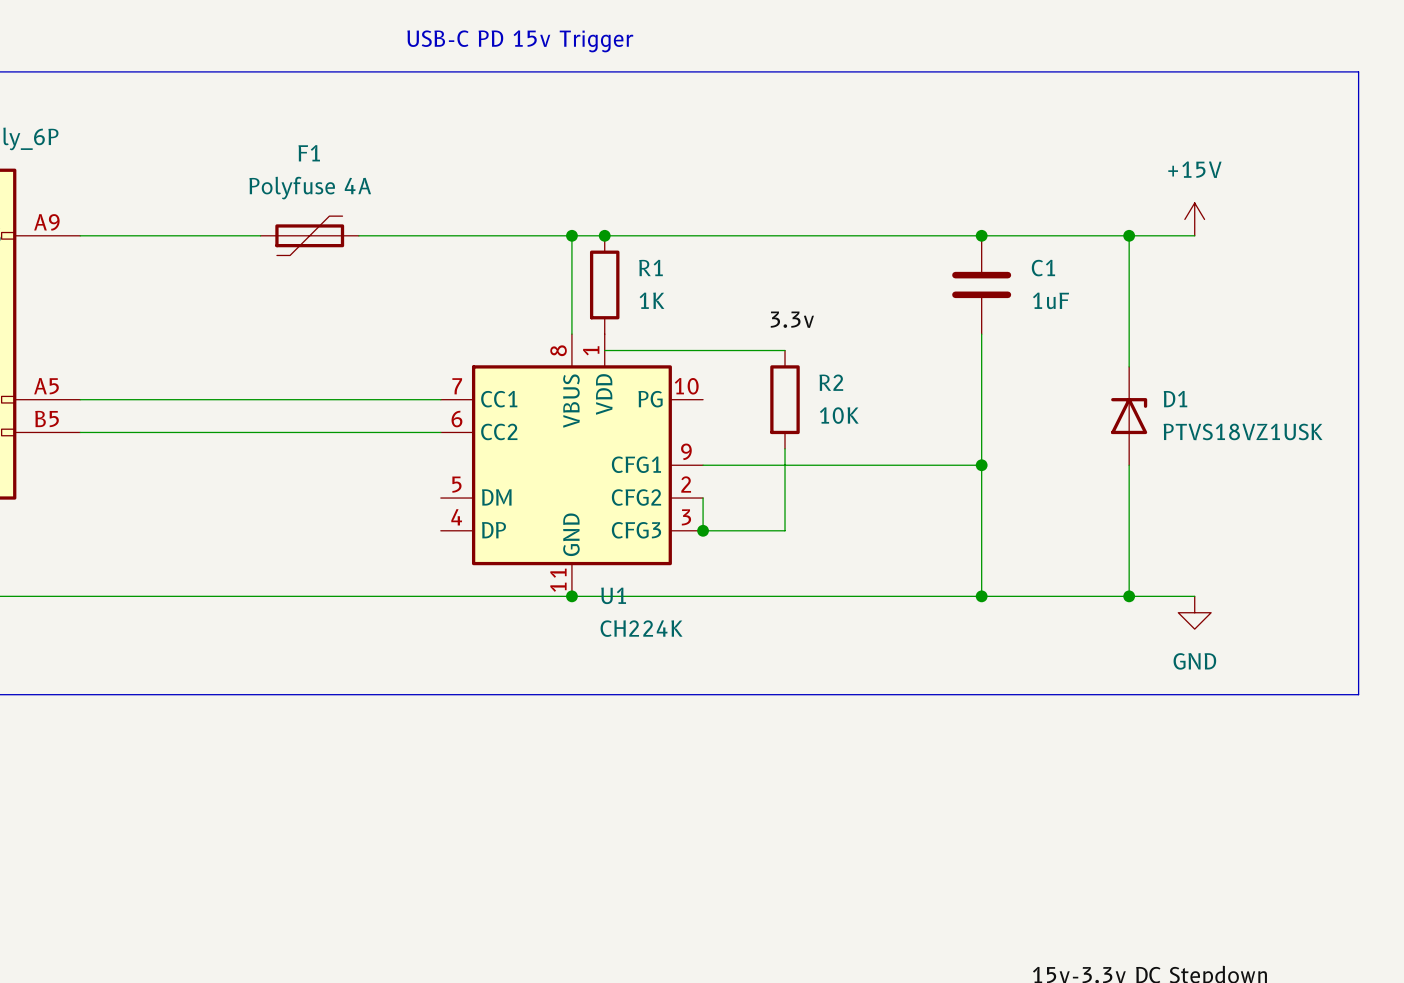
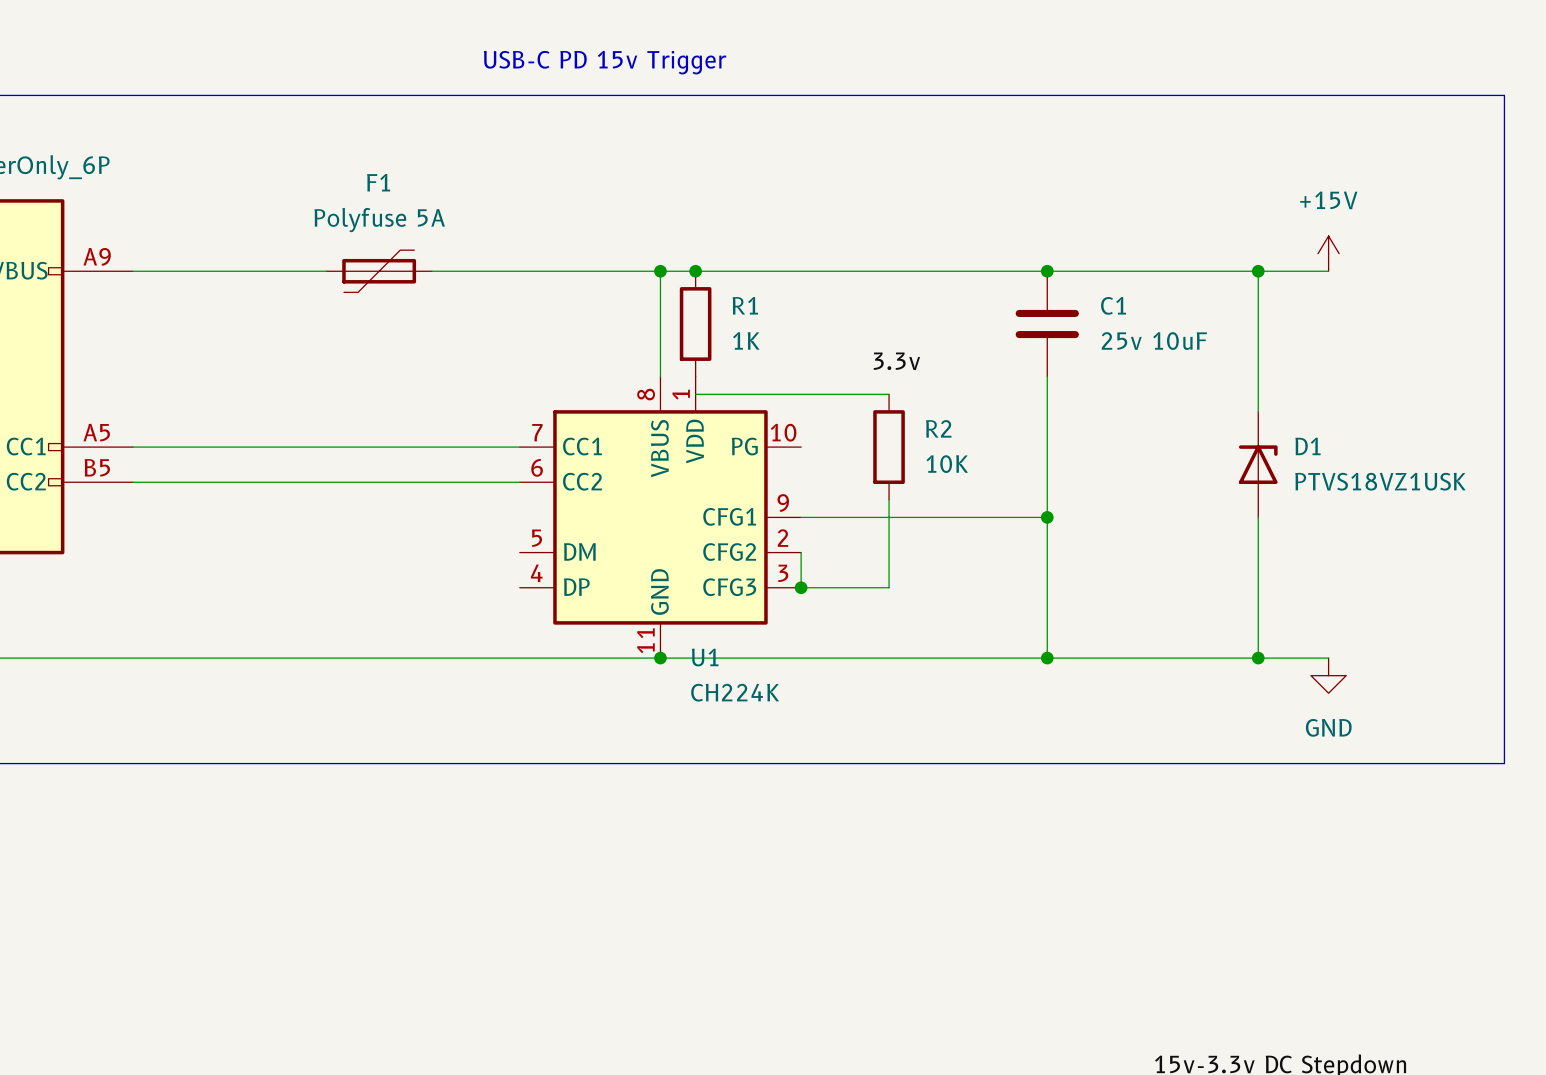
F1 value: Polyfuse 4A (310, 188) -> Polyfuse 5A (379, 220)
junction position: (981, 235) -> (1047, 271)
C1 position: (981, 284) -> (1047, 324)
C1 value: 1uF (1051, 300) -> 25v 10uF (1154, 341)
wire: (981, 334) (981, 596) -> (1047, 376) (1047, 658)
wire: (932, 465) (981, 465) -> none
junction position: (981, 465) -> (1047, 517)
junction position: (981, 596) -> (1047, 658)

